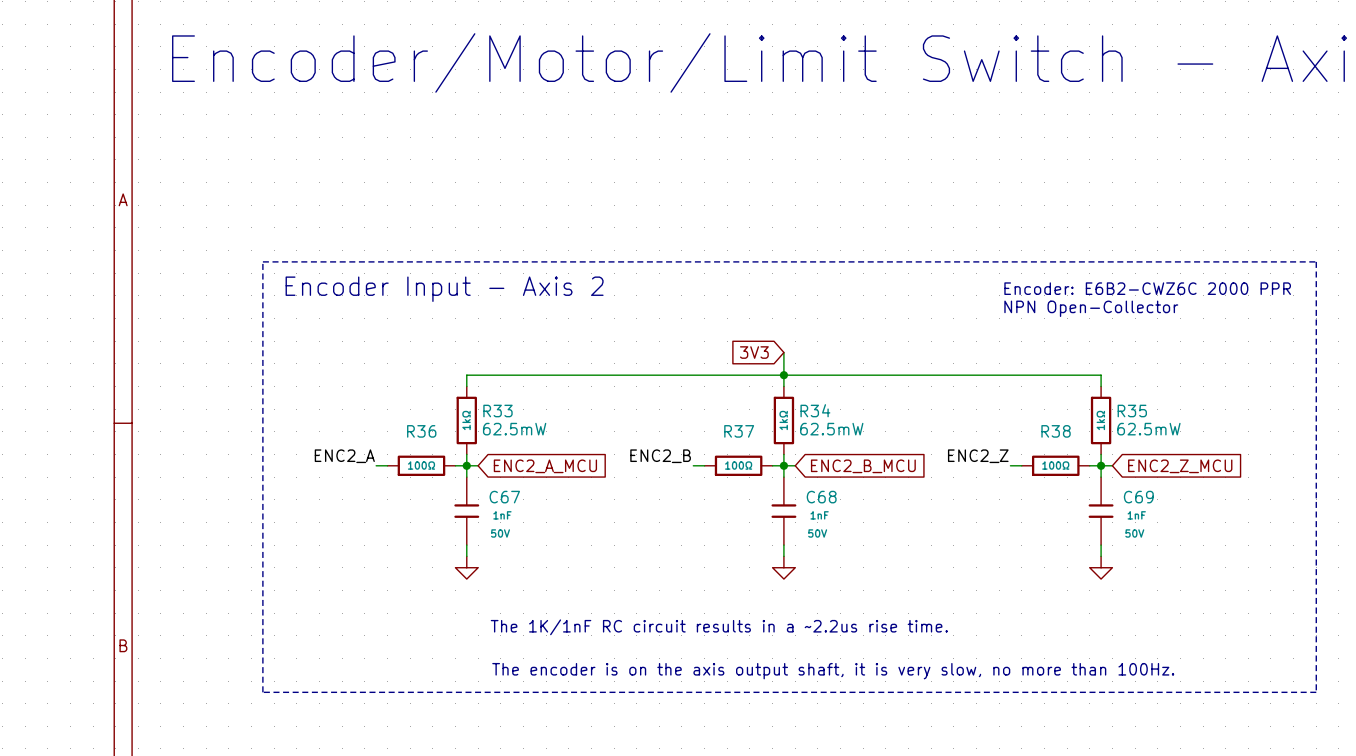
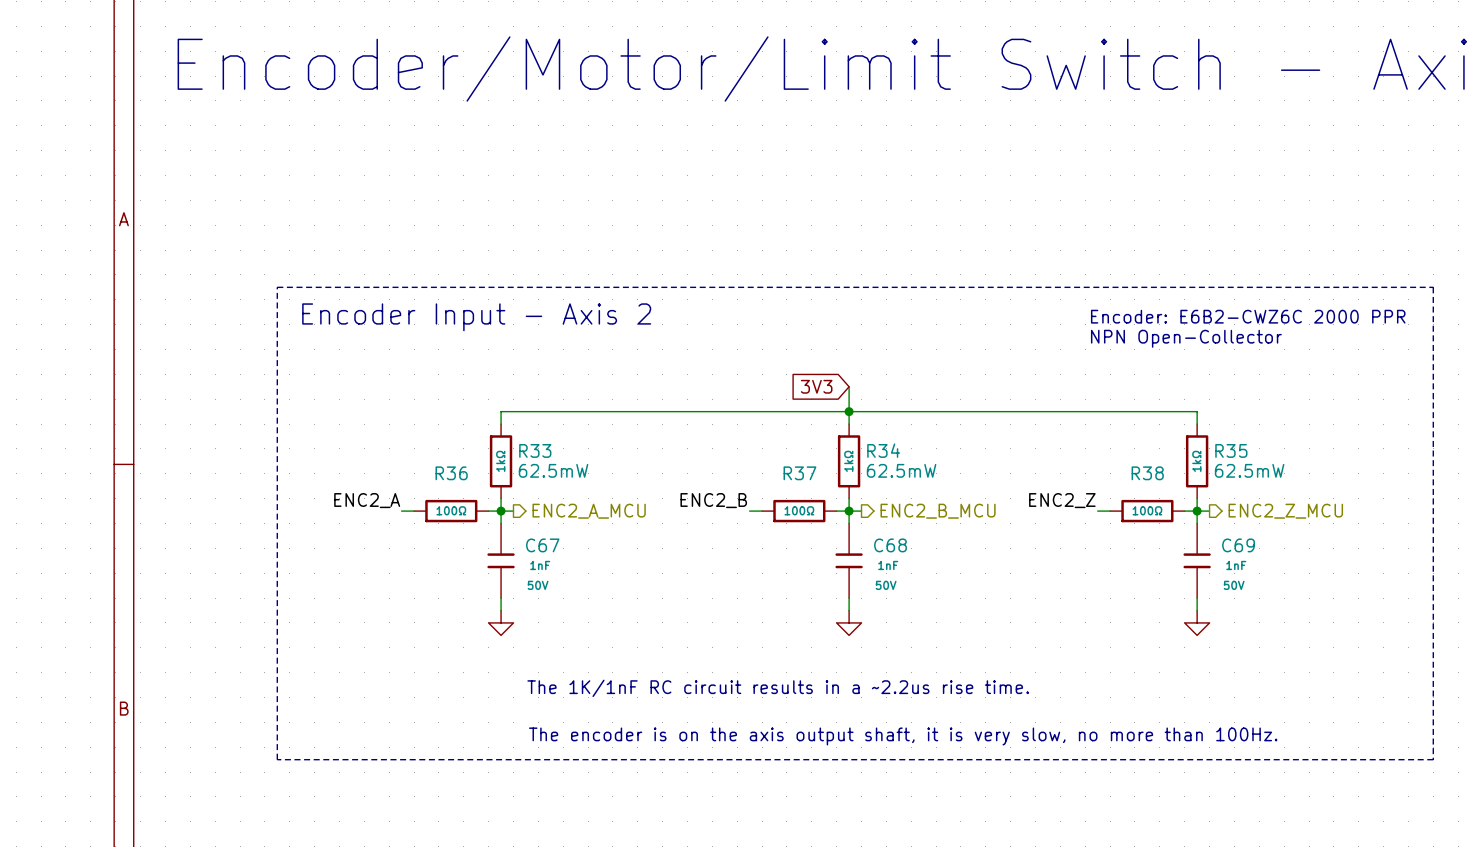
hierarchical label: none -> ENC2_A_MCU (589, 511)
hierarchical label: none -> ENC2_B_MCU (938, 511)
hierarchical label: none -> ENC2_Z_MCU (1285, 511)
global label: ENC2_A_MCU (545, 466) -> none
global label: ENC2_B_MCU (863, 466) -> none
global label: ENC2_Z_MCU (1180, 466) -> none

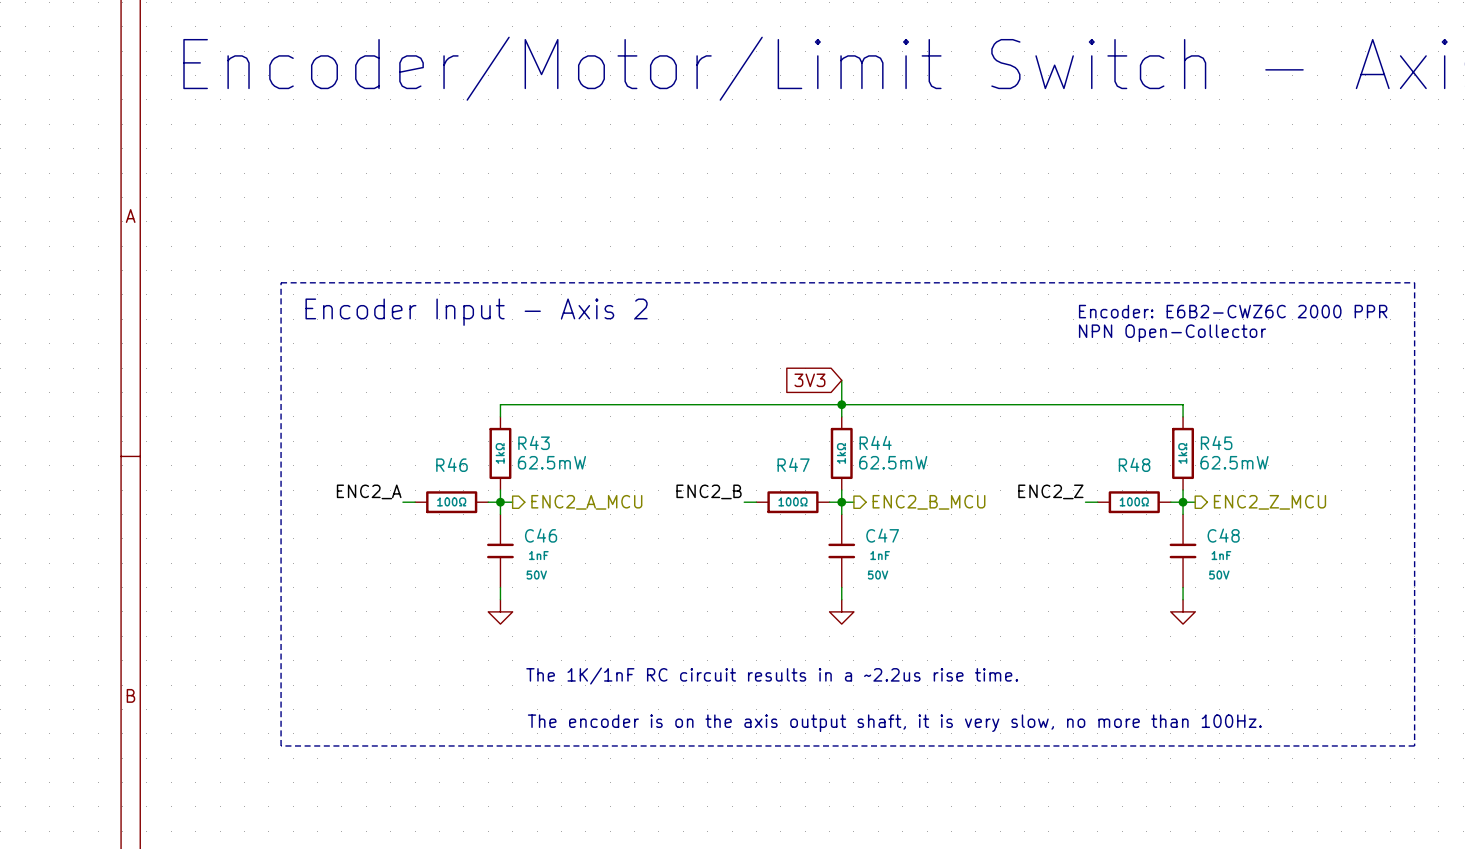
R33 name: R33 (535, 450) -> R43 (534, 442)
R34 name: R34 (883, 450) -> R44 (875, 442)
R35 name: R35 (1231, 450) -> R45 (1216, 442)
R36 name: R36 (451, 473) -> R46 (451, 464)
R37 name: R37 (799, 473) -> R47 (793, 464)
R38 name: R38 (1147, 473) -> R48 (1134, 464)
C67 name: C67 (542, 545) -> C46 (541, 535)
C68 name: C68 (890, 545) -> C47 (882, 535)
C69 name: C69 (1238, 545) -> C48 (1223, 535)

